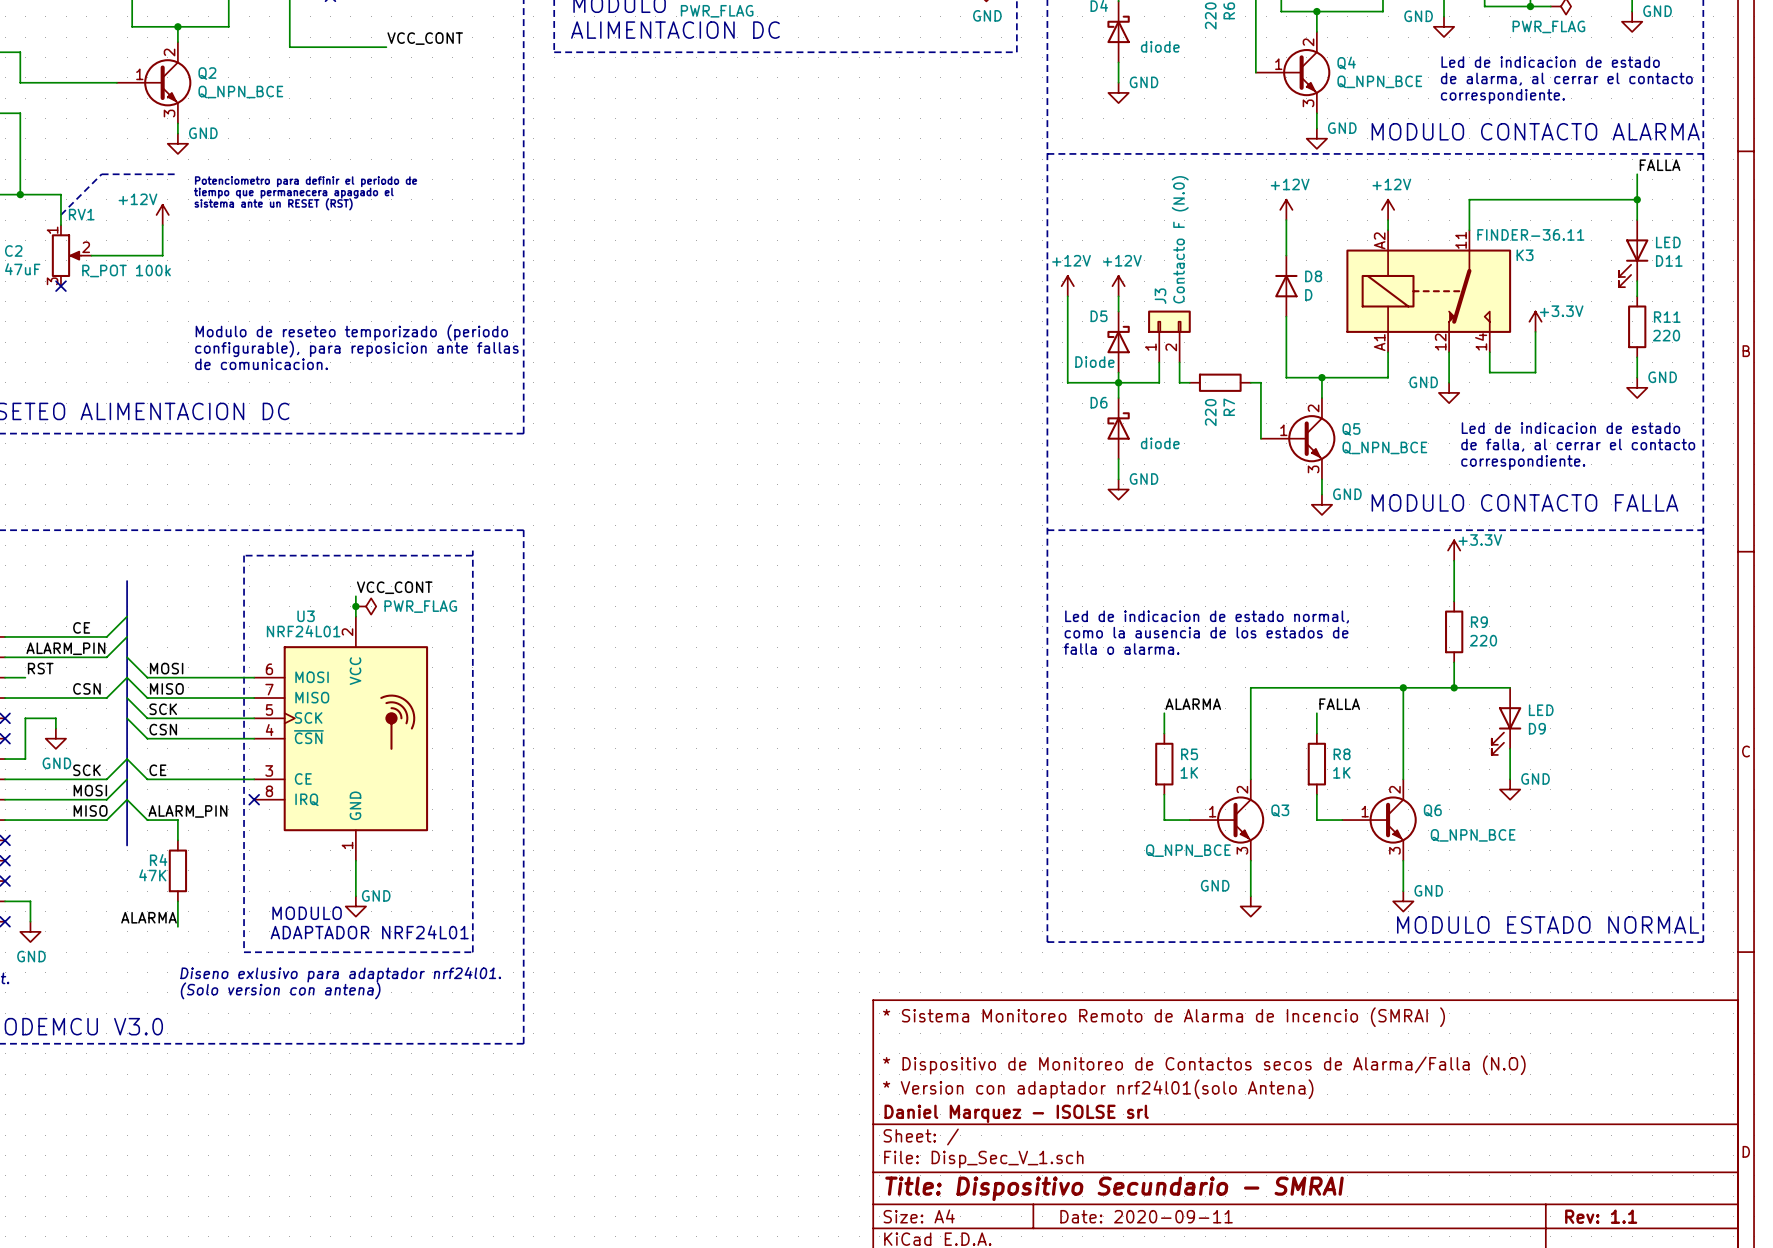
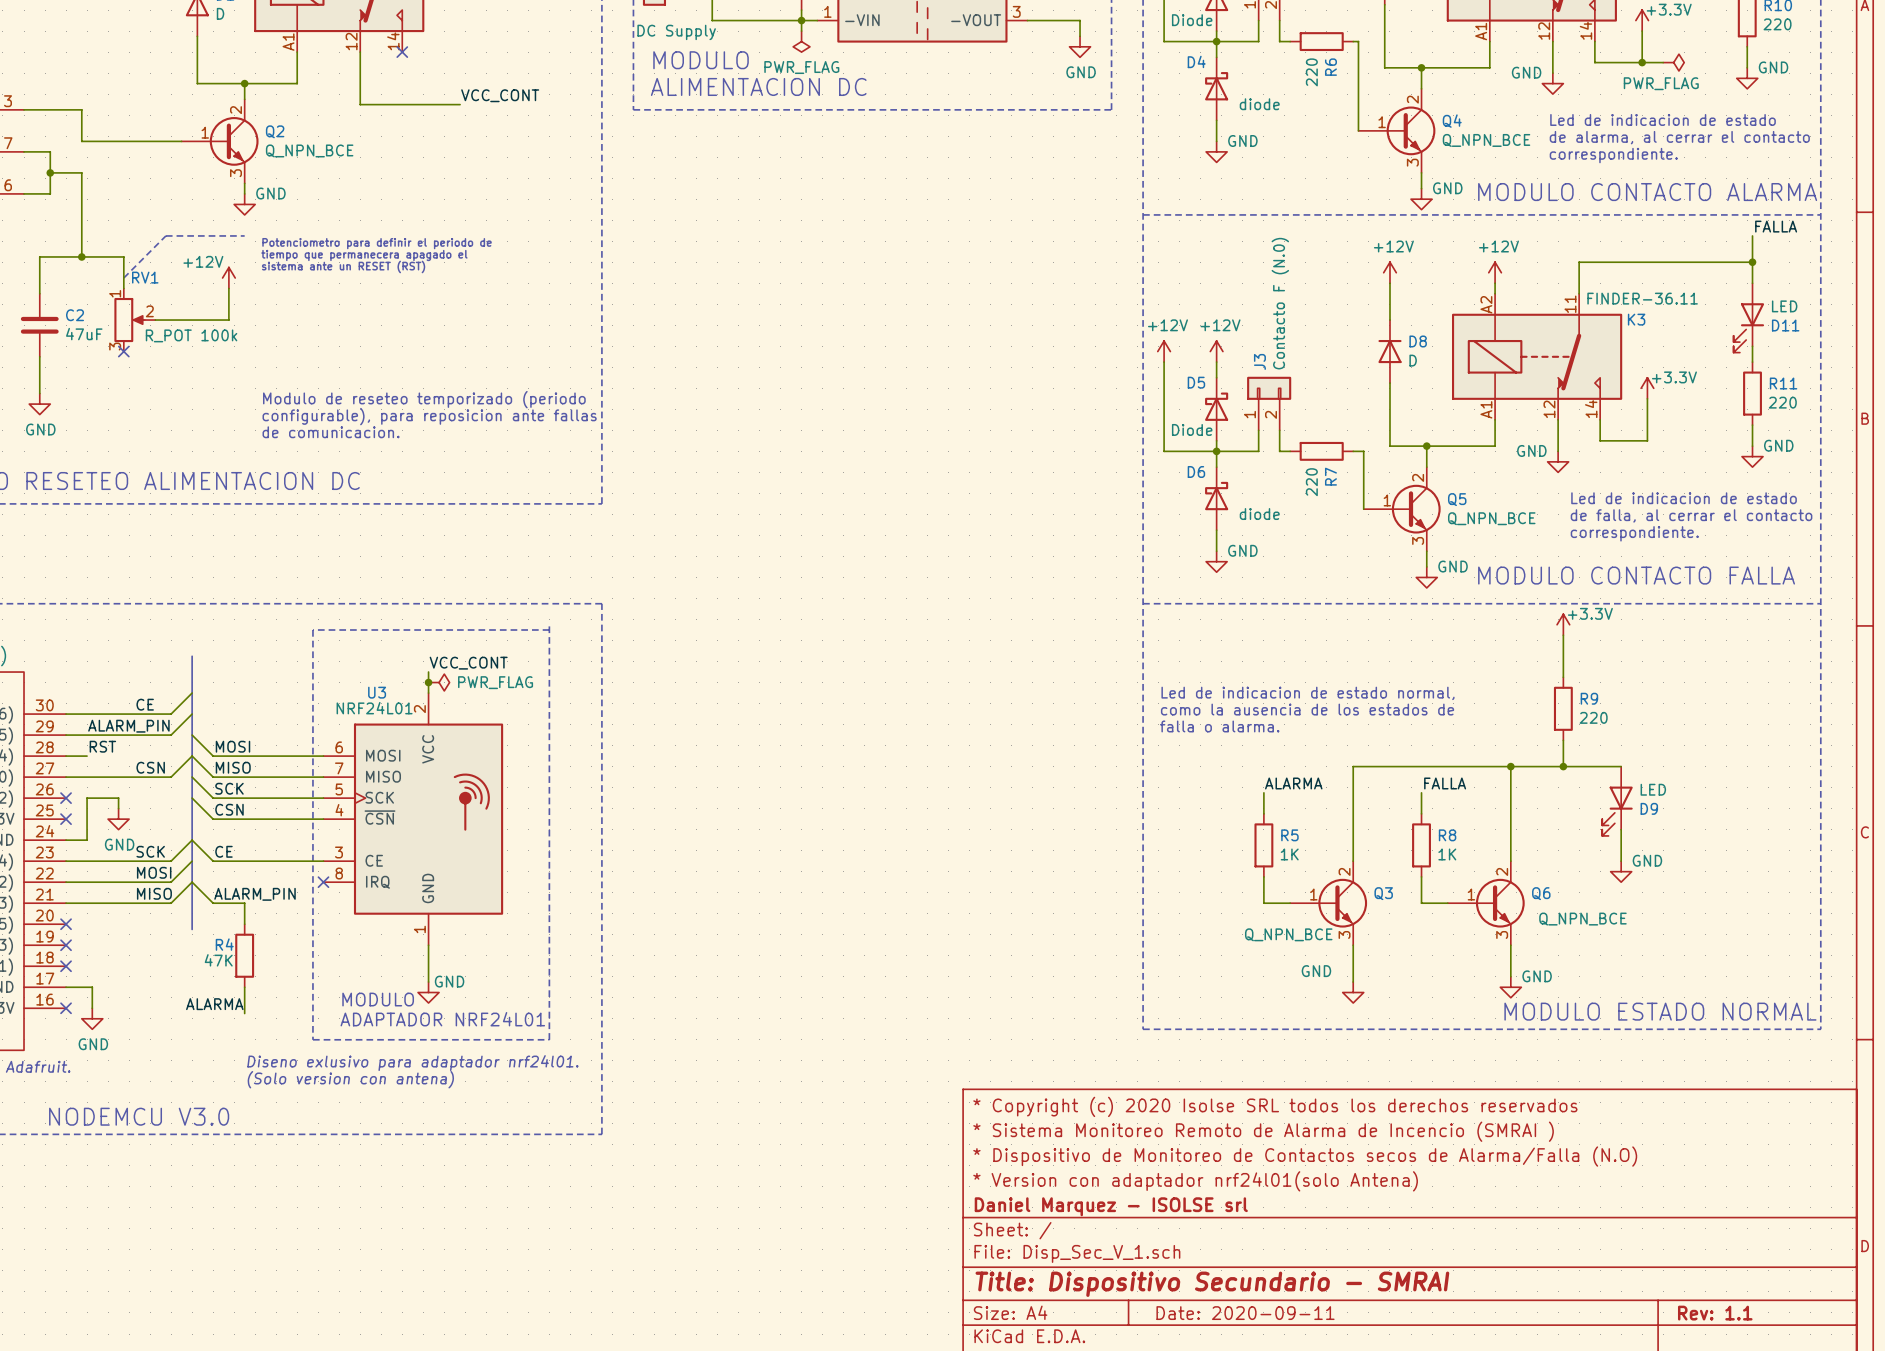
title block: * Sistema Monitoreo Remoto de Alarma de Incencio (SMRAI ) (1164, 1017) -> * Copyright (c) 2020 Isolse SRL todos los derechos reservados (1275, 1106)
title block: none -> * Sistema Monitoreo Remoto de Alarma de Incencio (SMRAI ) (1263, 1131)

